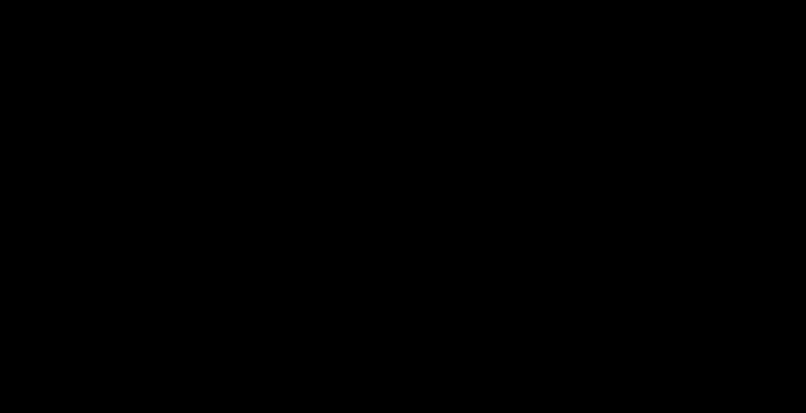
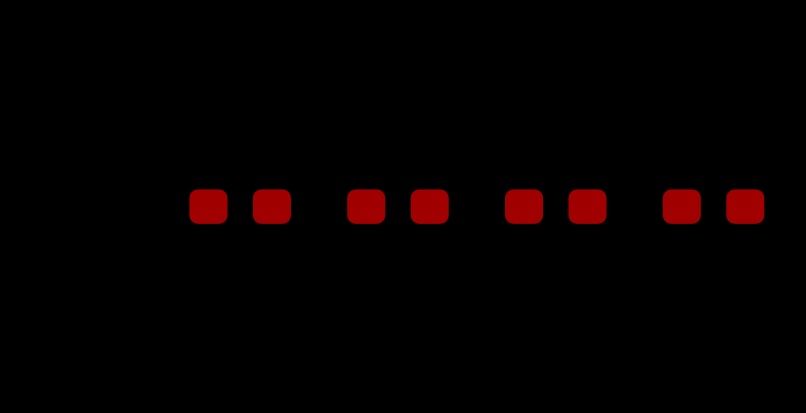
part: none -> (240, 206)
part: none -> (397, 206)
part: none -> (555, 206)
part: none -> (713, 206)

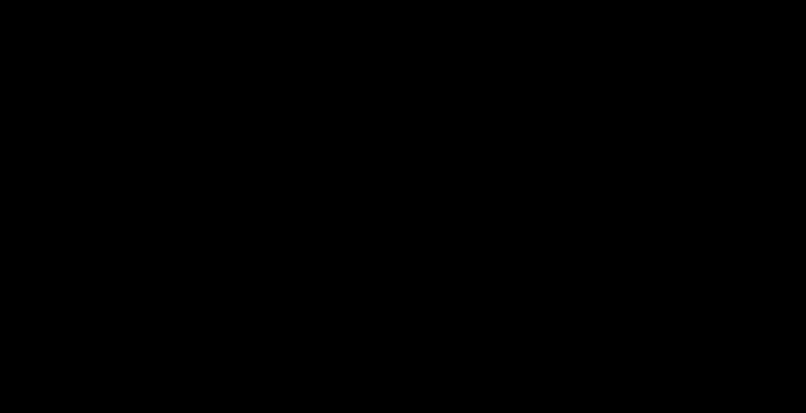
part: (240, 206) -> none
part: (397, 206) -> none
part: (555, 206) -> none
part: (713, 206) -> none

